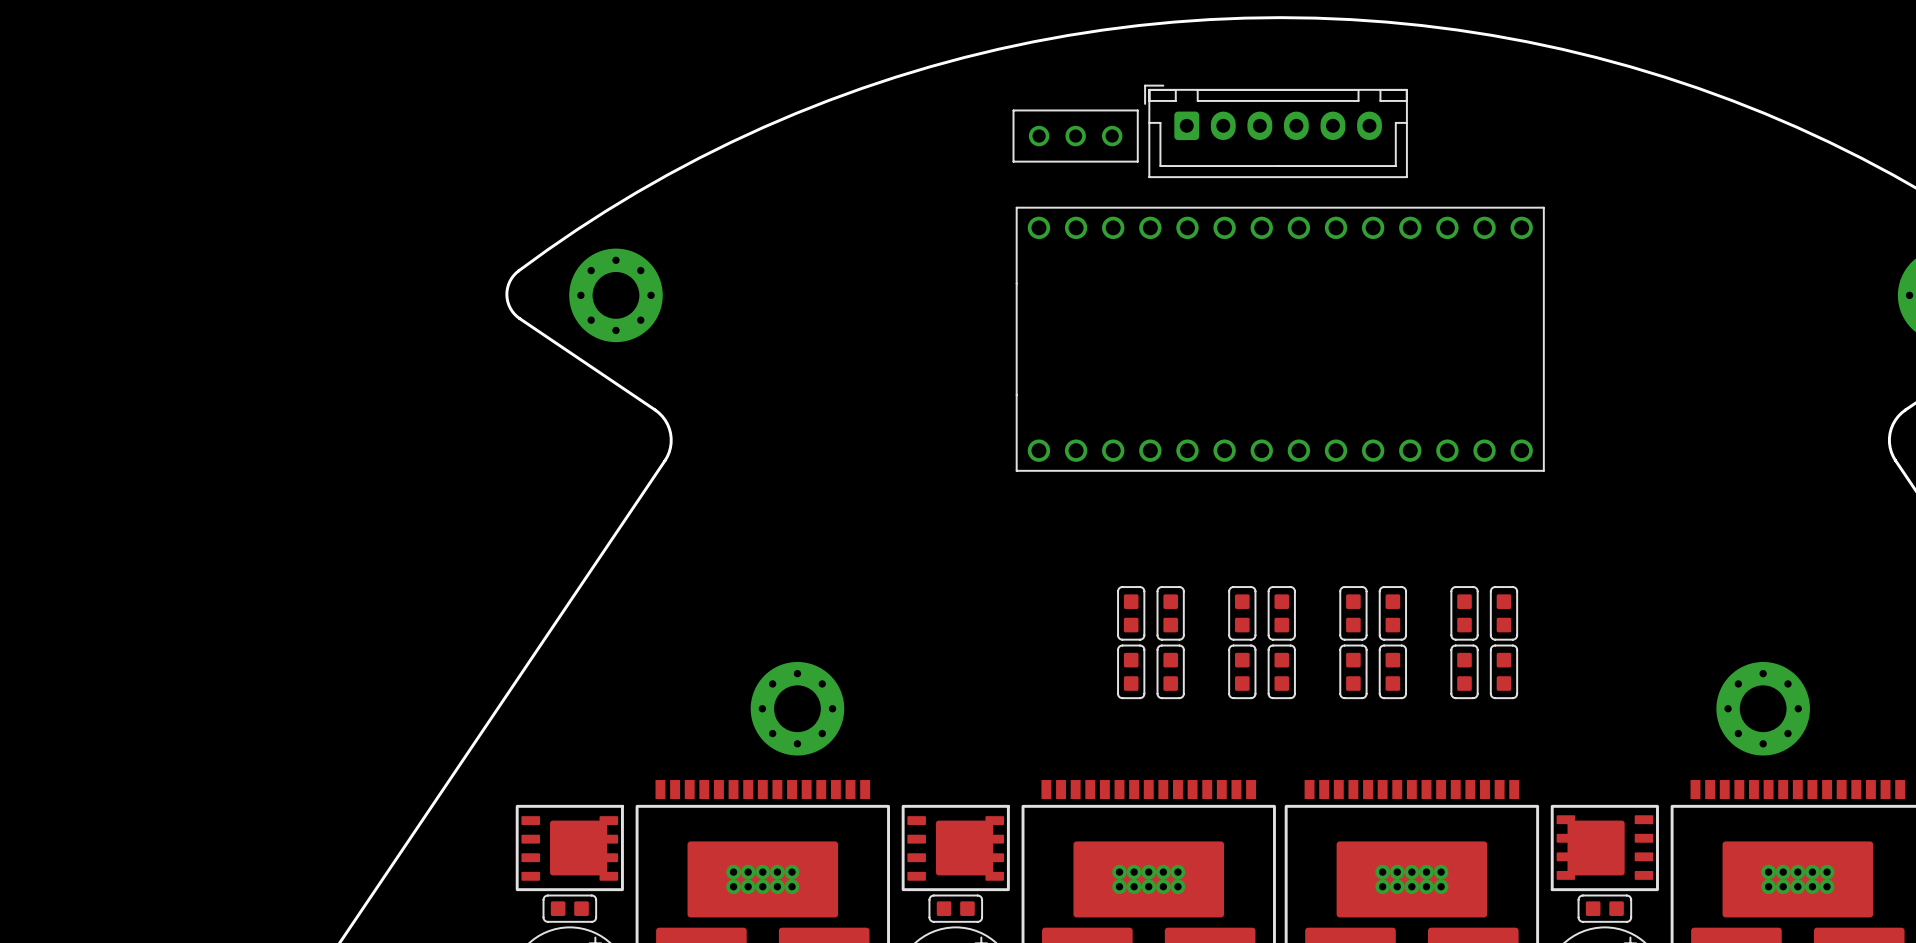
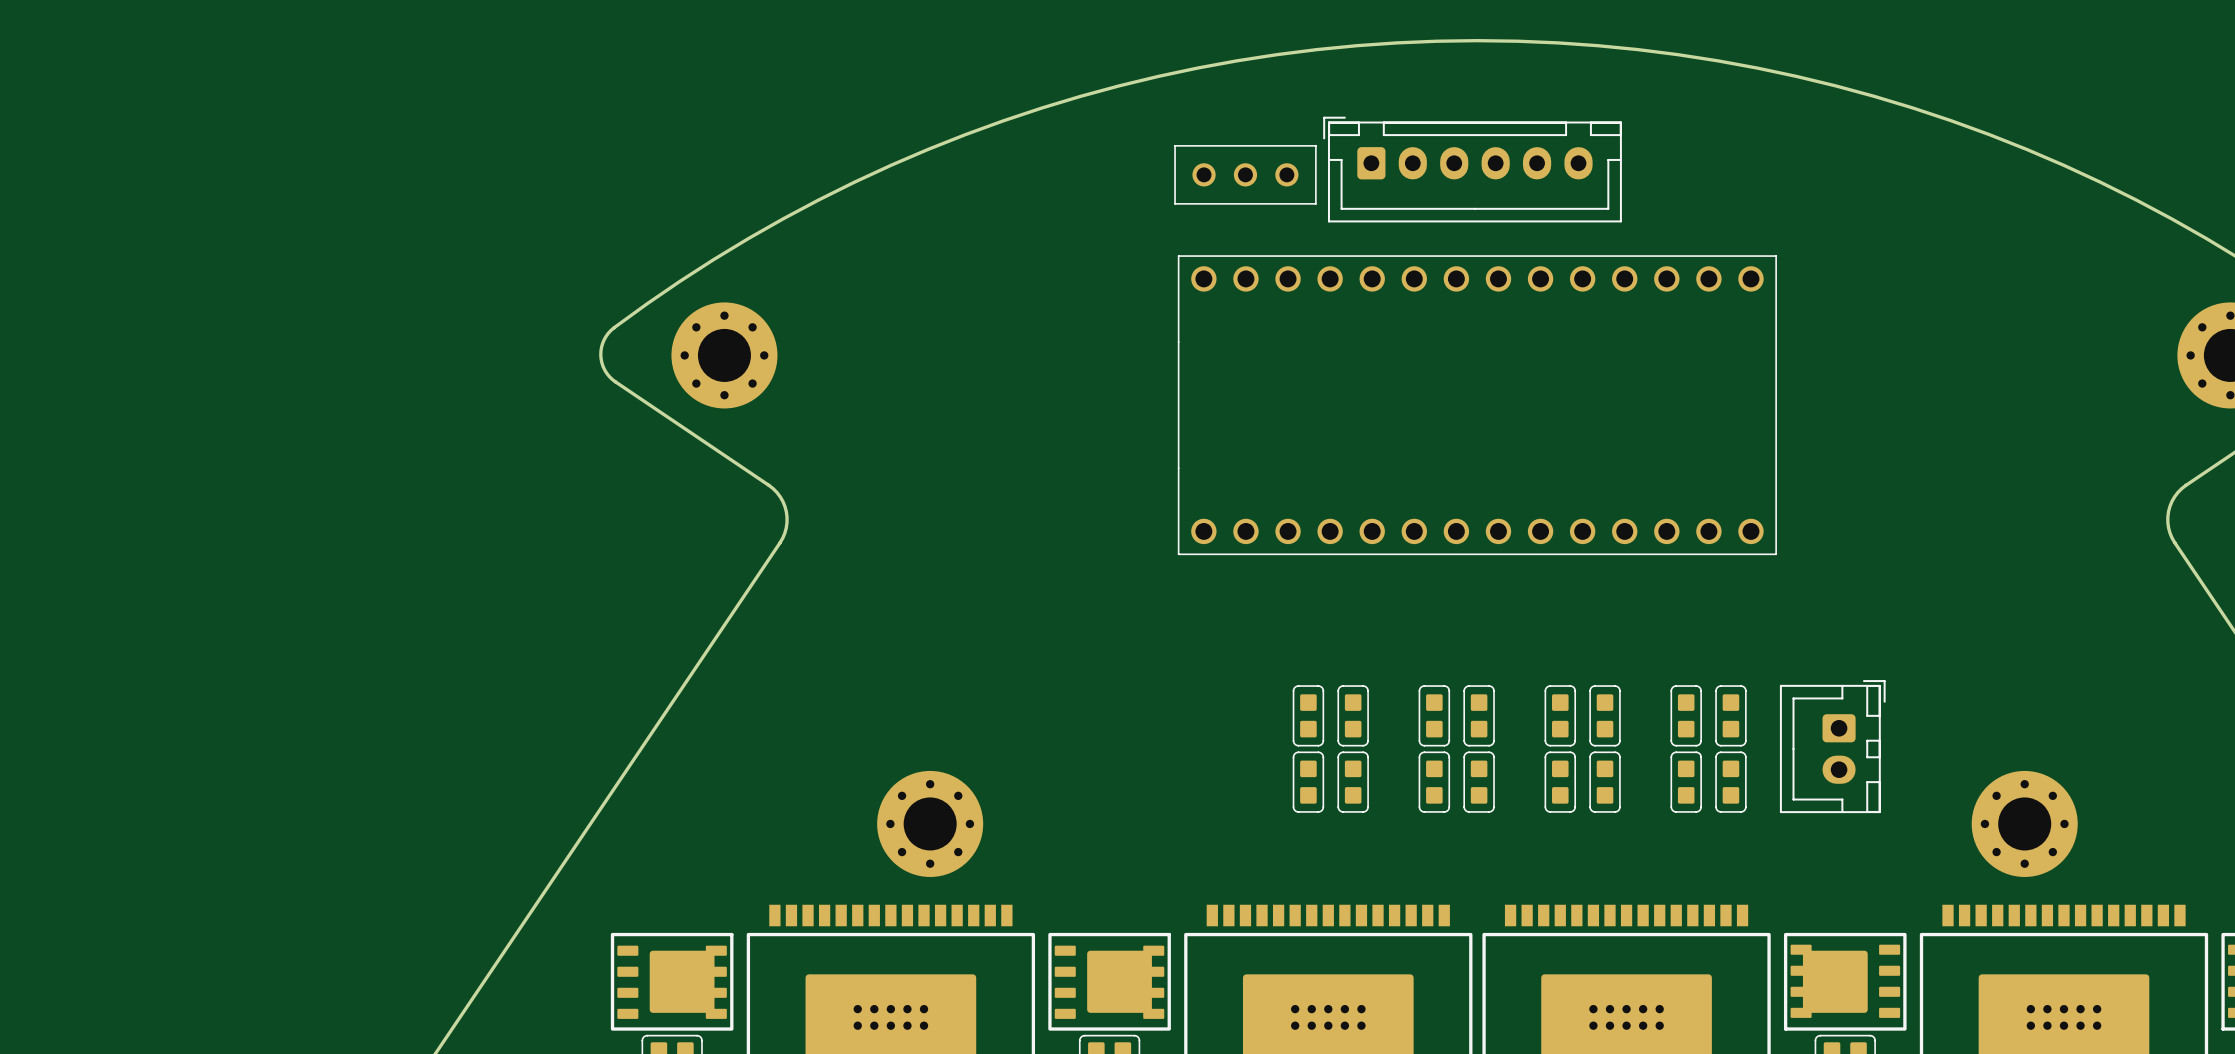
part: none -> (1832, 746)

